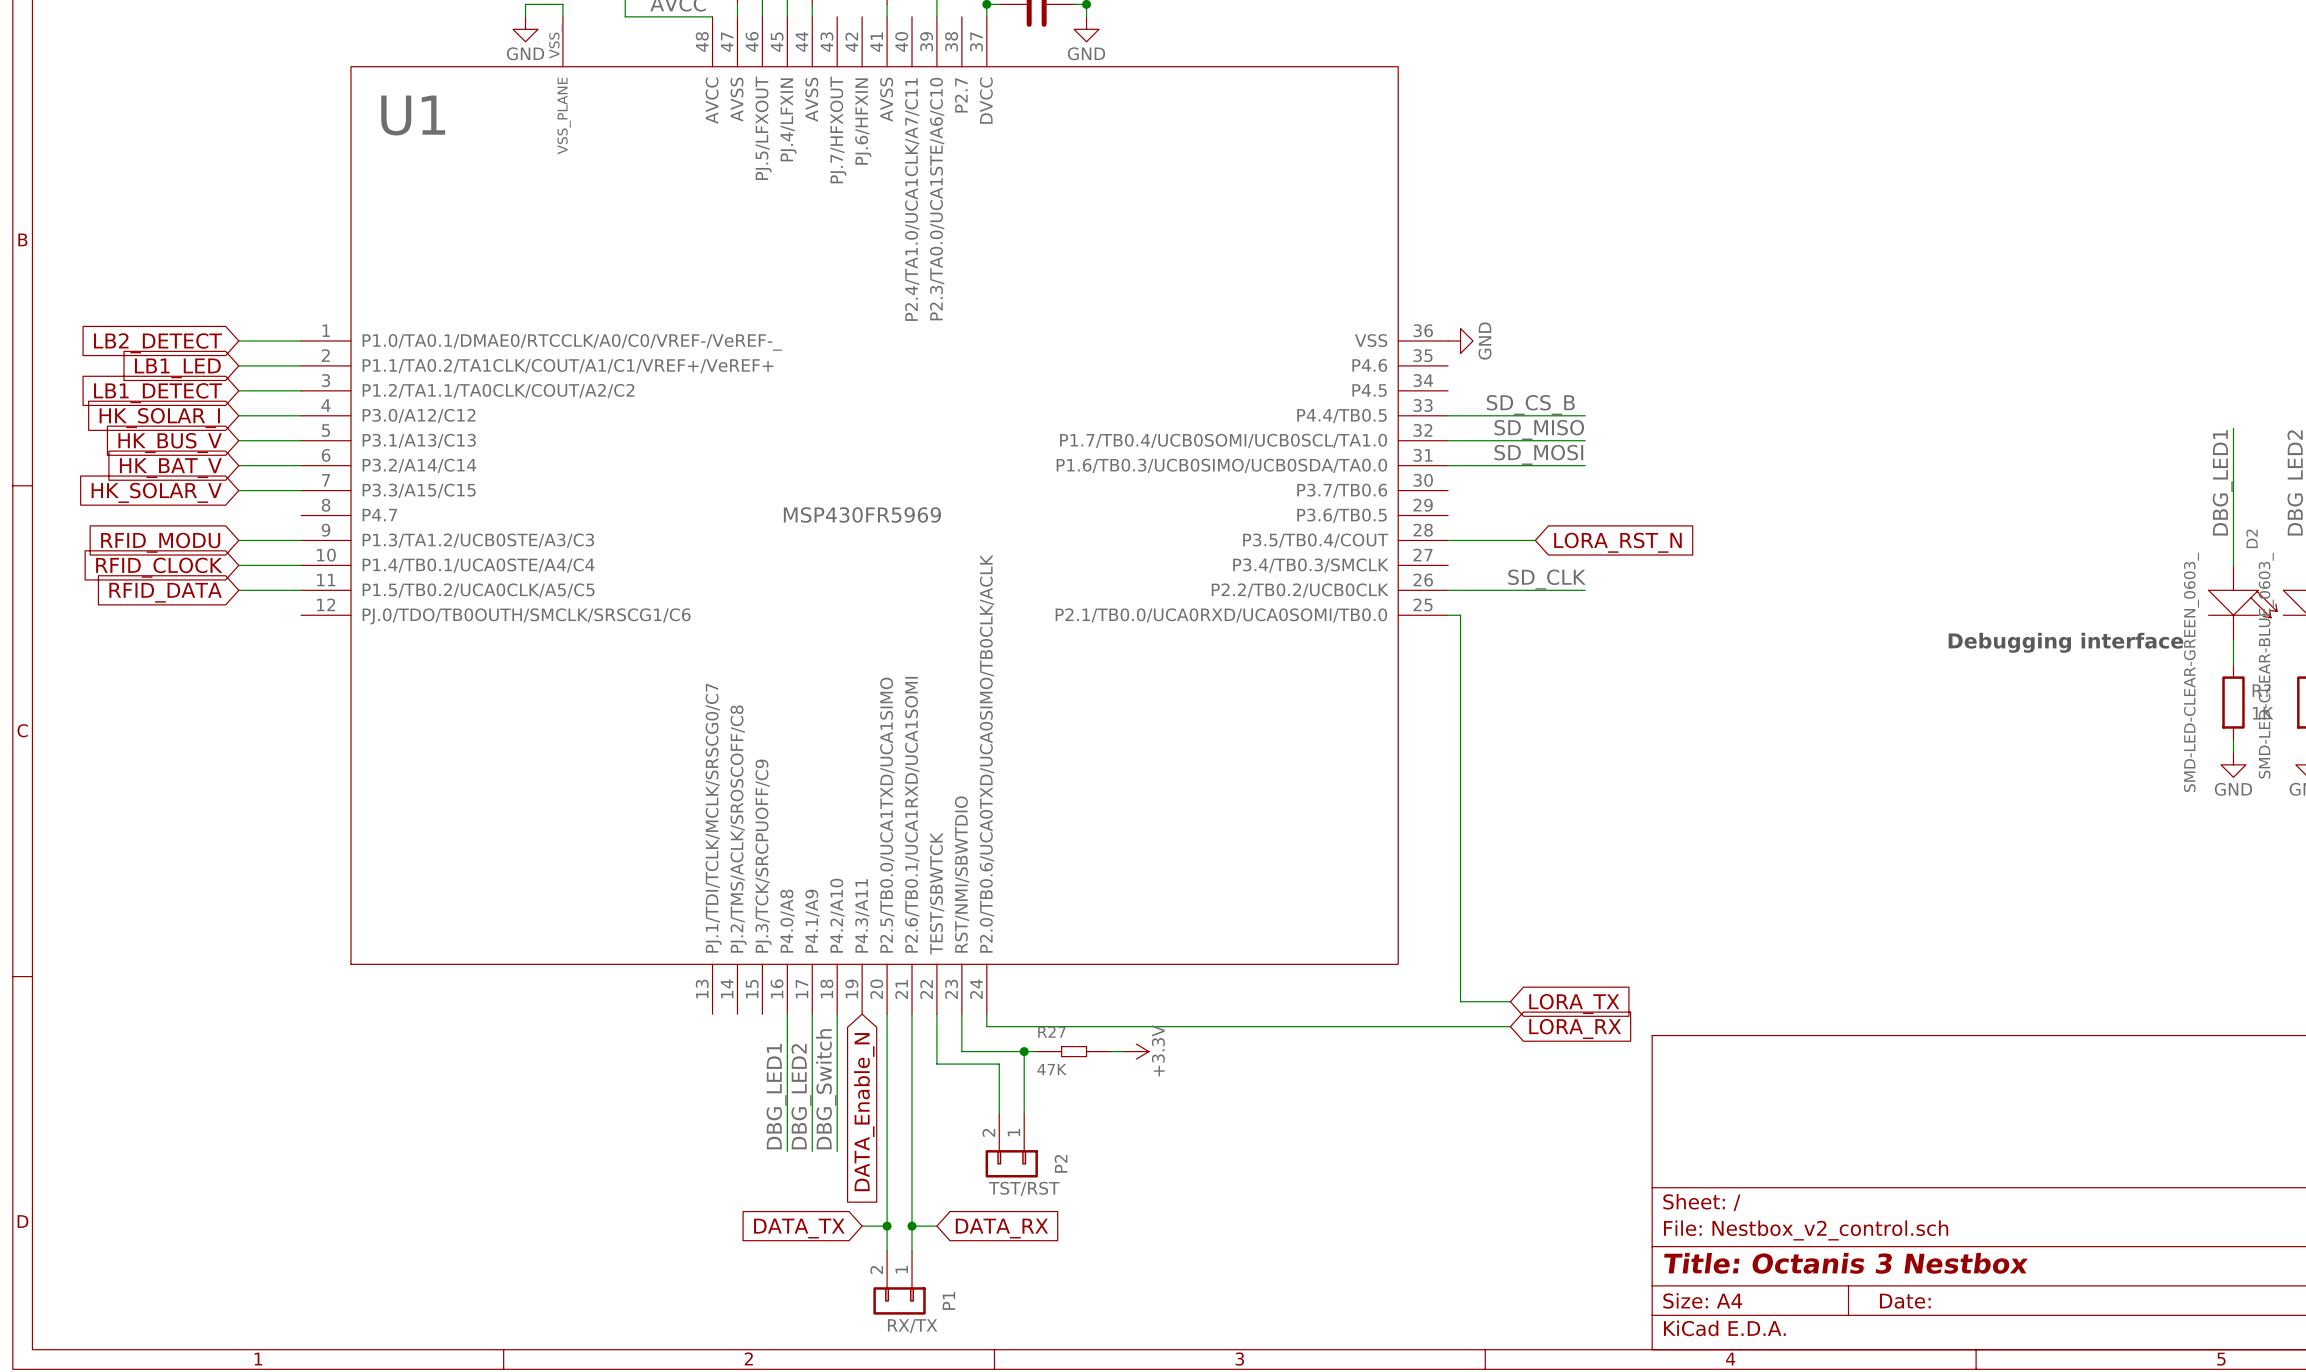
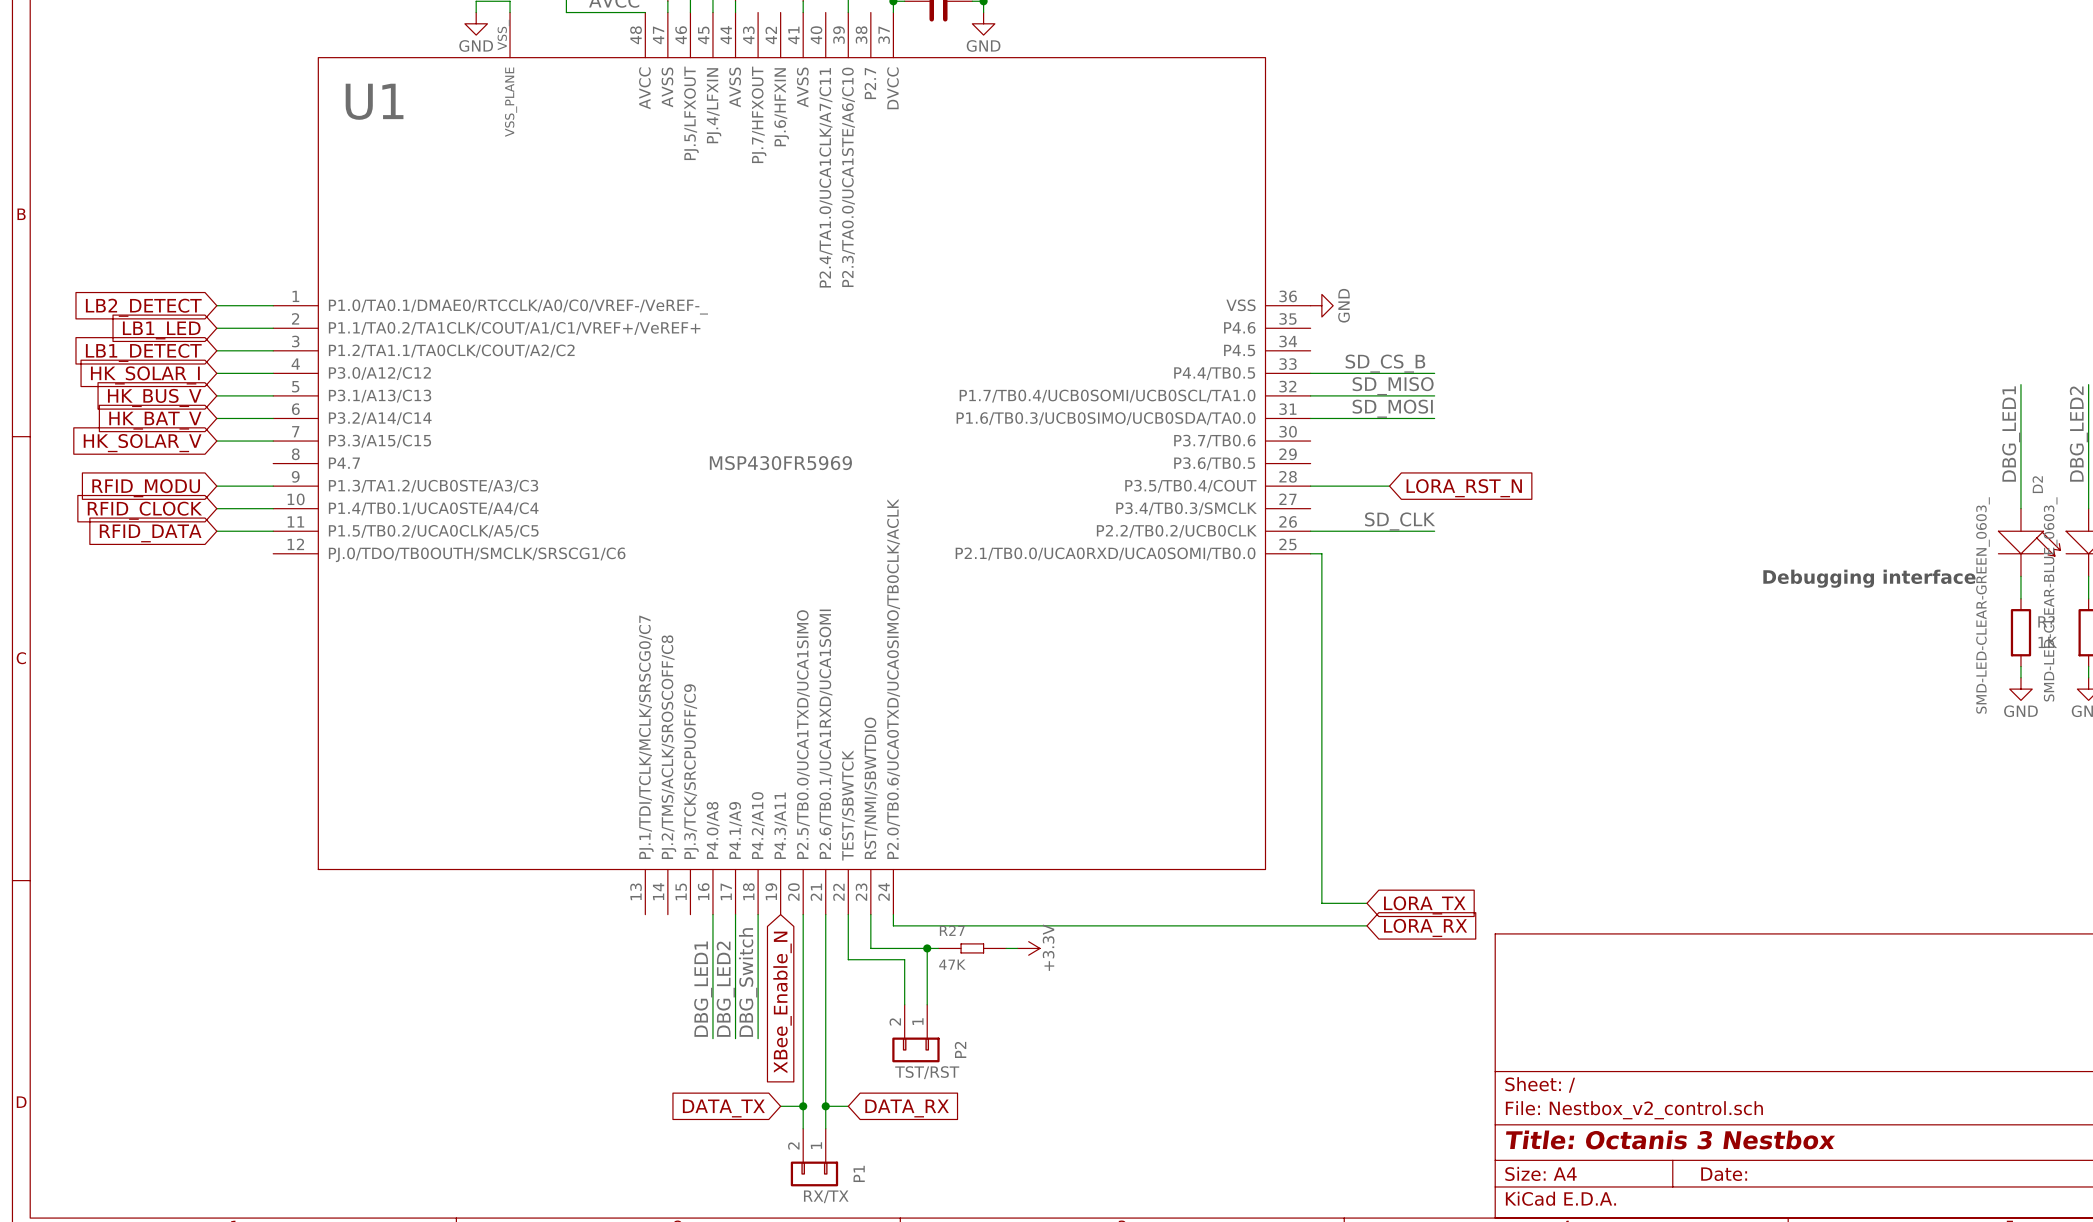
global label: DATA_Enable_N (864, 1112) -> XBee_Enable_N (782, 1002)

